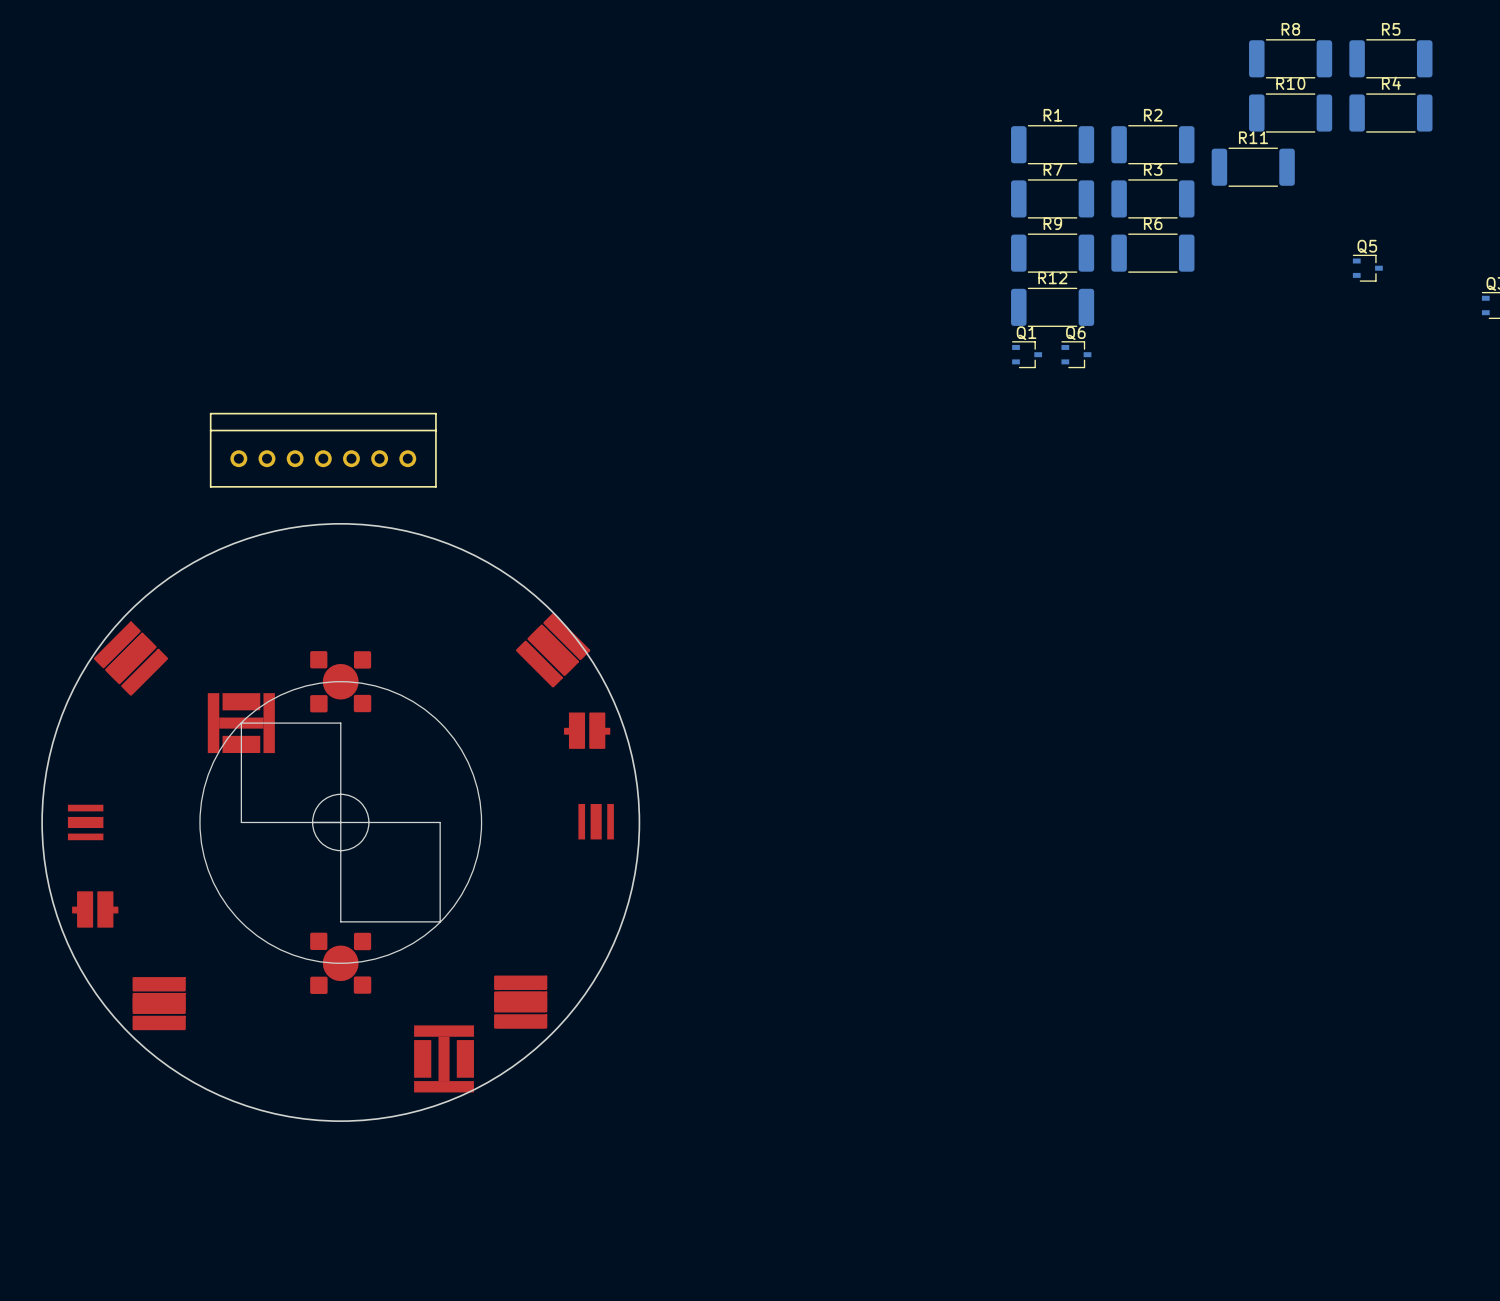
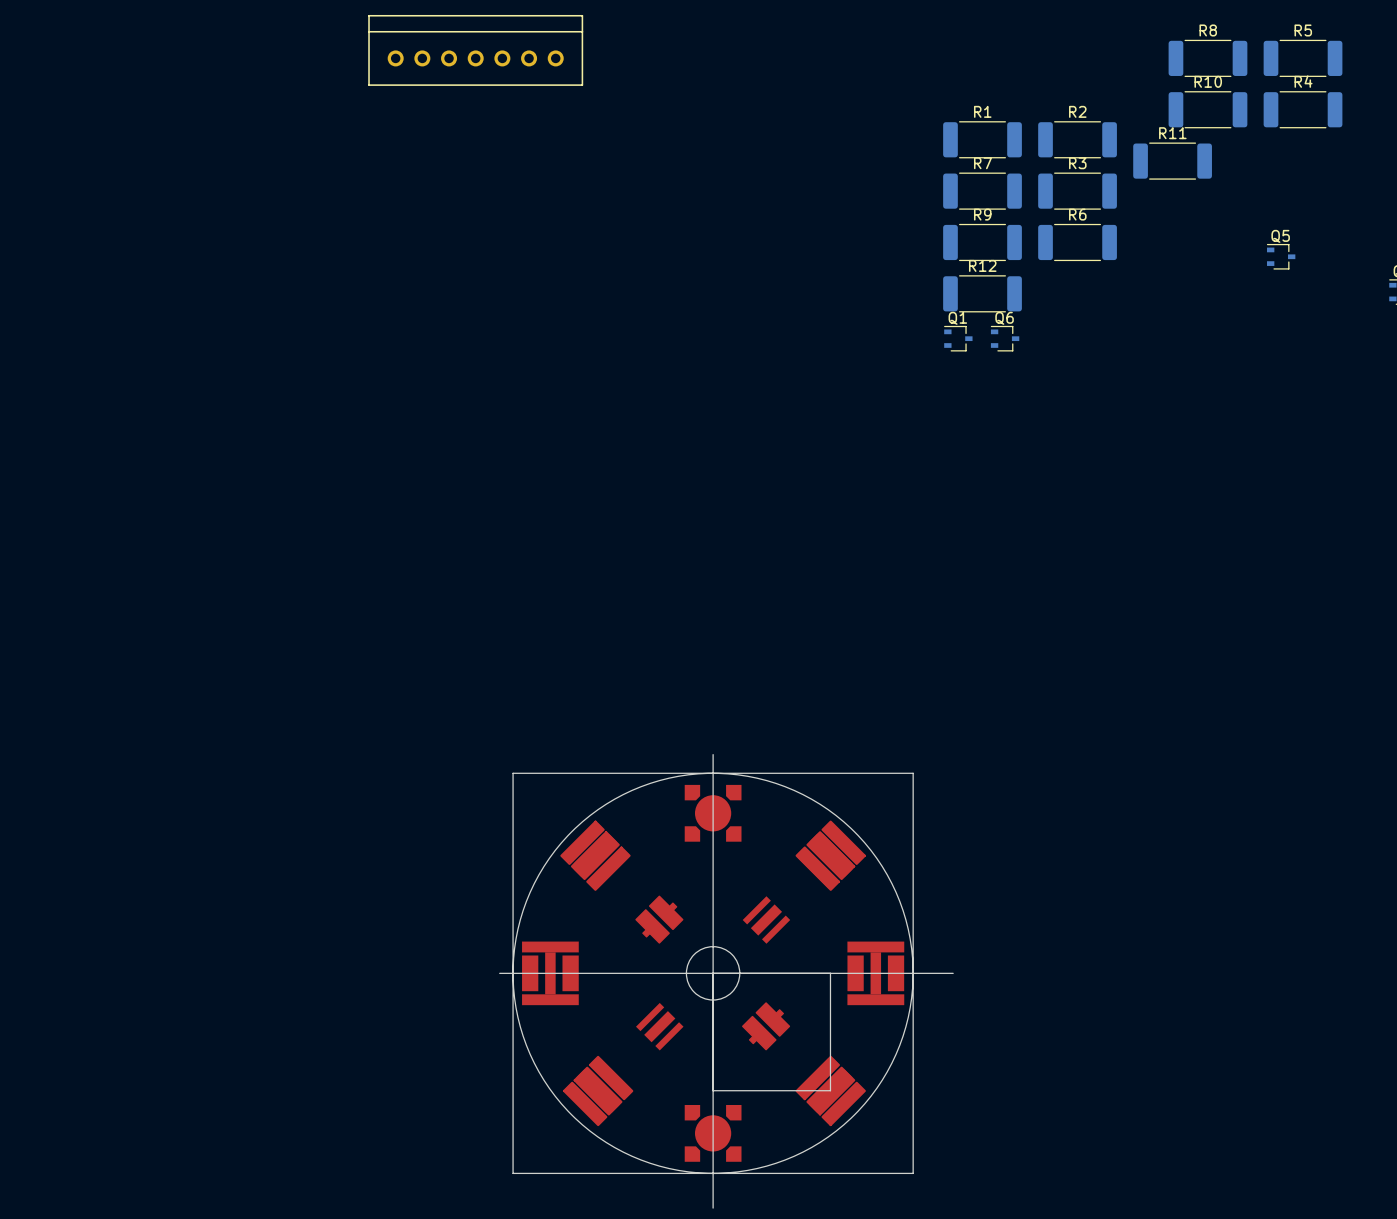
part: none -> (475, 50)
part: (323, 450) -> none
round board edge: [41, 522, 641, 1122] -> none
part: (553, 650) -> none
part: (130, 658) -> none
round board edge: [199, 681, 483, 964] -> none
part: (340, 681) -> none
part: (241, 723) -> none
board edge: (340, 723) (340, 921) (440, 921) (440, 822) (241, 822) (241, 723) (340, 723) -> none
part: (587, 730) -> none
round board edge: [312, 793, 370, 852] -> none
board edge: none -> (713, 754) (713, 1208)
round board edge: none -> [512, 772, 914, 1174]
board edge: none -> (913, 773) (513, 773) (513, 1173) (913, 1173) (913, 773)
part: (596, 821) -> none
part: (85, 822) -> none
part: none -> (713, 813)
part: none -> (595, 855)
part: none -> (830, 855)
part: (95, 909) -> none
part: (340, 963) -> none
part: none -> (659, 919)
part: none -> (766, 920)
round board edge: none -> [685, 946, 741, 1001]
part: (520, 1002) -> none
part: (159, 1003) -> none
board edge: none -> (830, 973) (830, 1090) (713, 1090)
part: none -> (875, 973)
board edge: none -> (953, 973) (499, 973)
part position: (444, 1058) -> (550, 973)
part: none -> (659, 1026)
part: none -> (766, 1026)
part: none -> (598, 1090)
part: none -> (830, 1090)
part: none -> (713, 1133)

